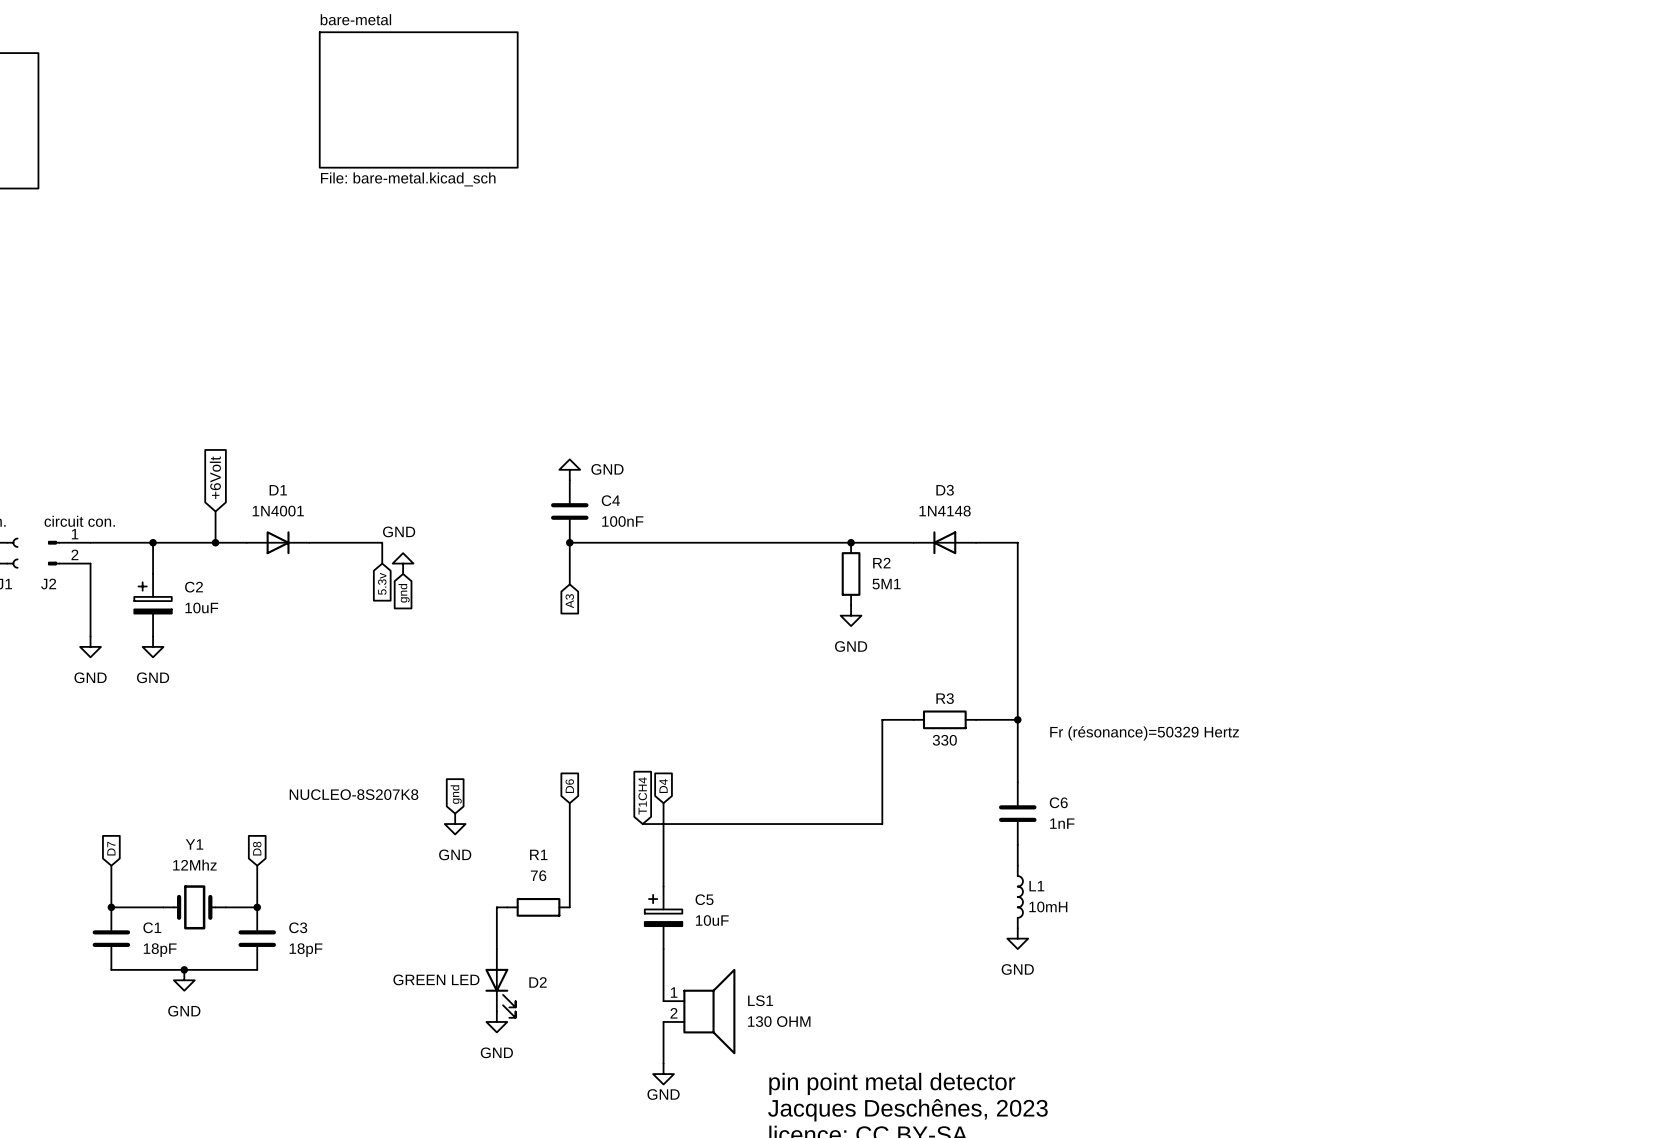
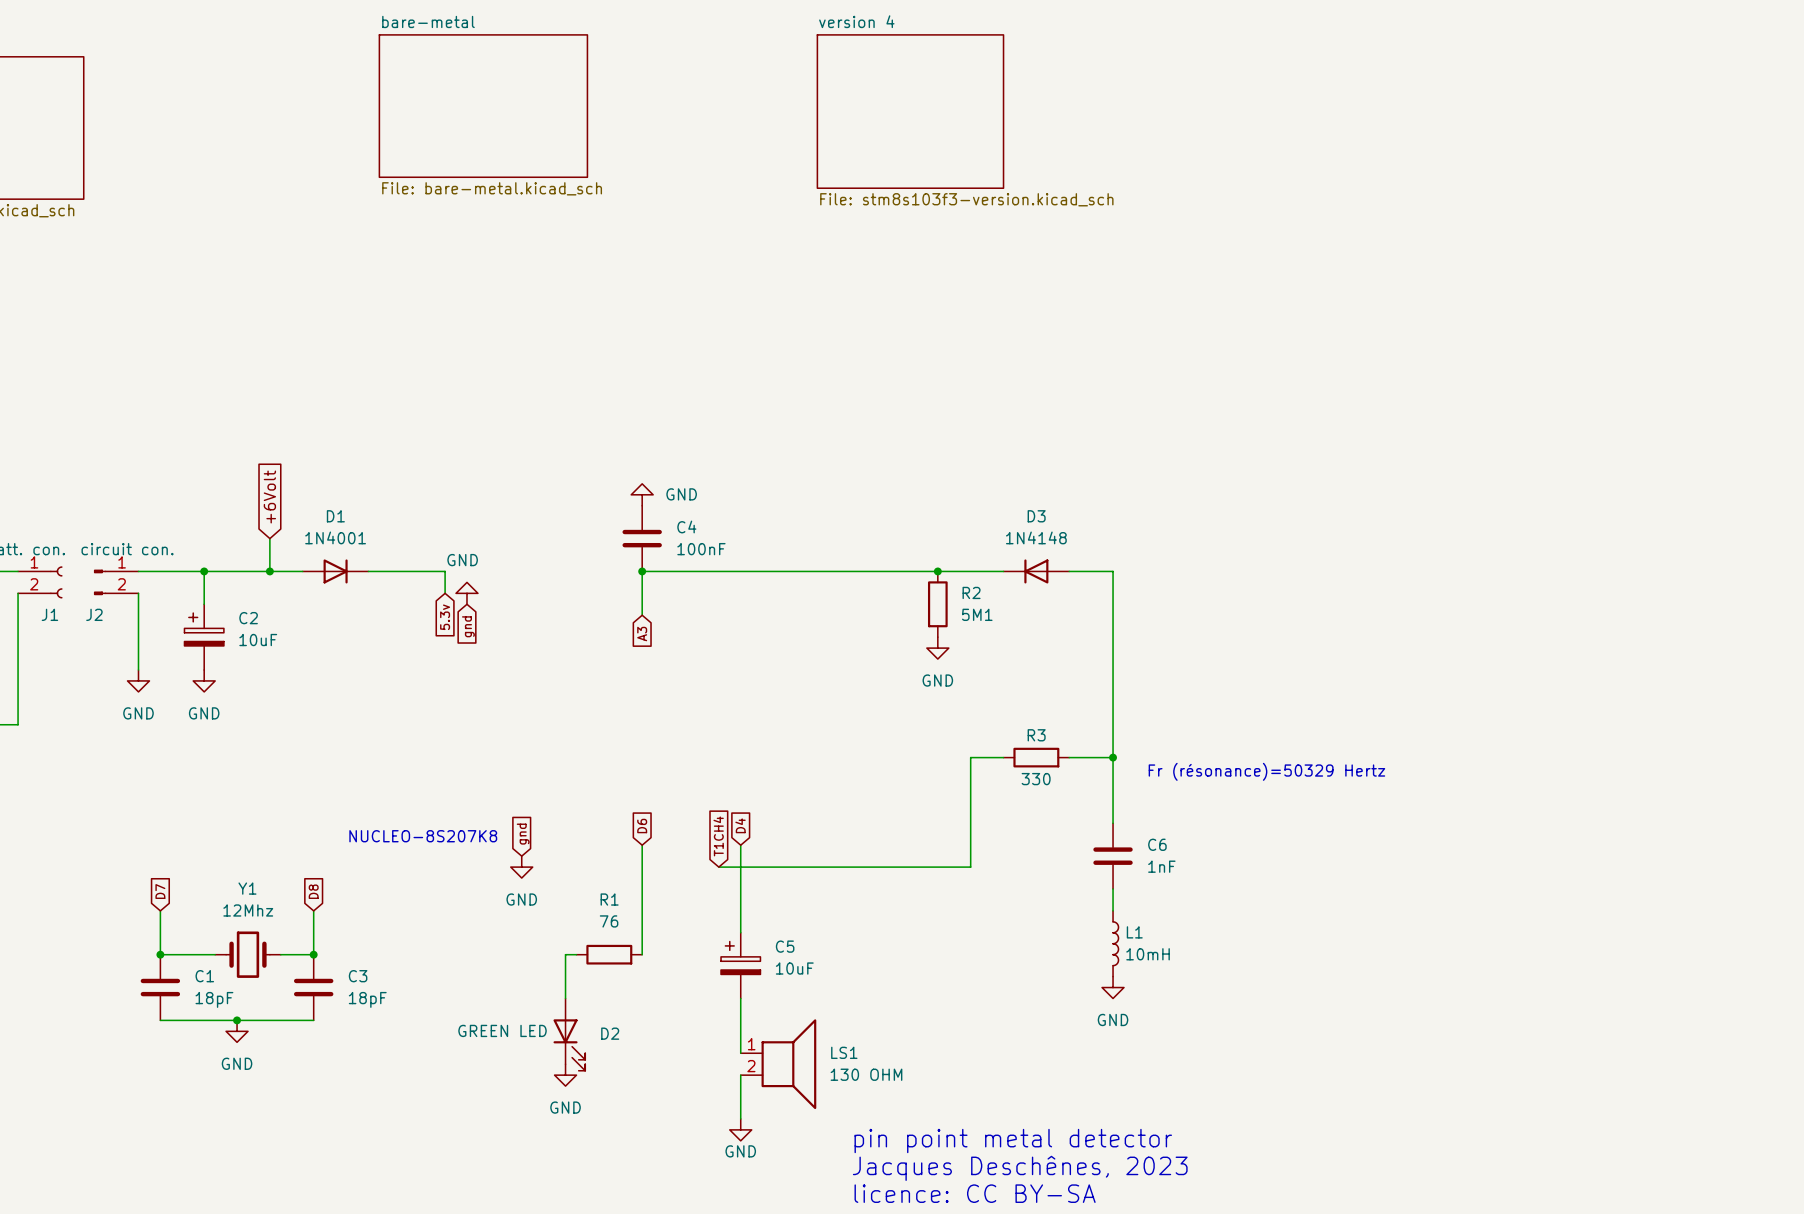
sheet version 4: none -> File: stm8s103f3-version.kicad_sch (910, 111)

